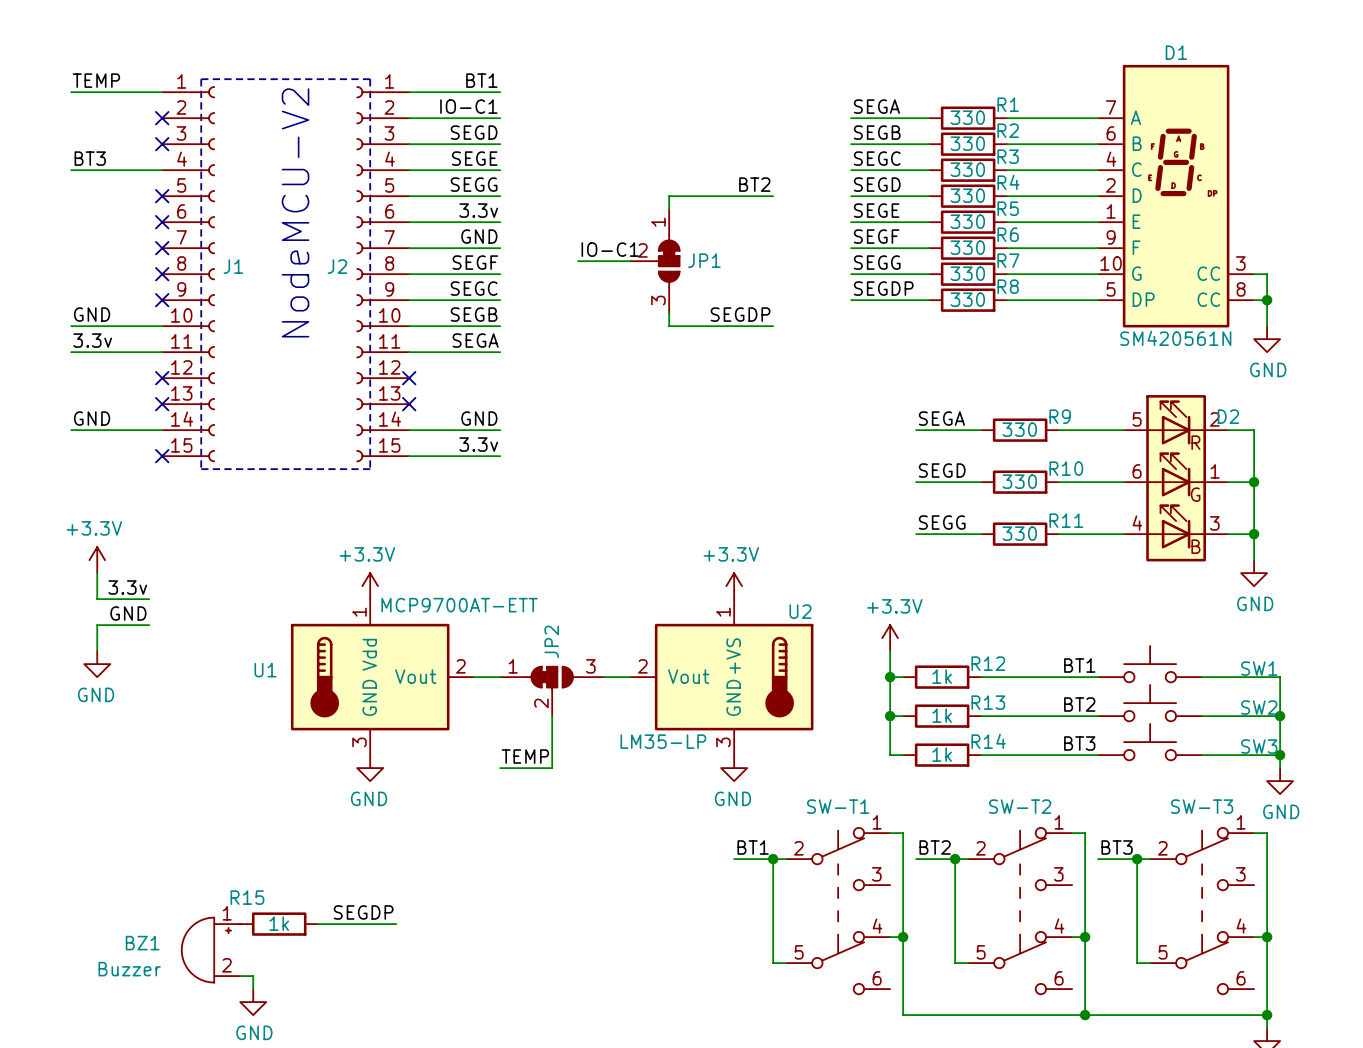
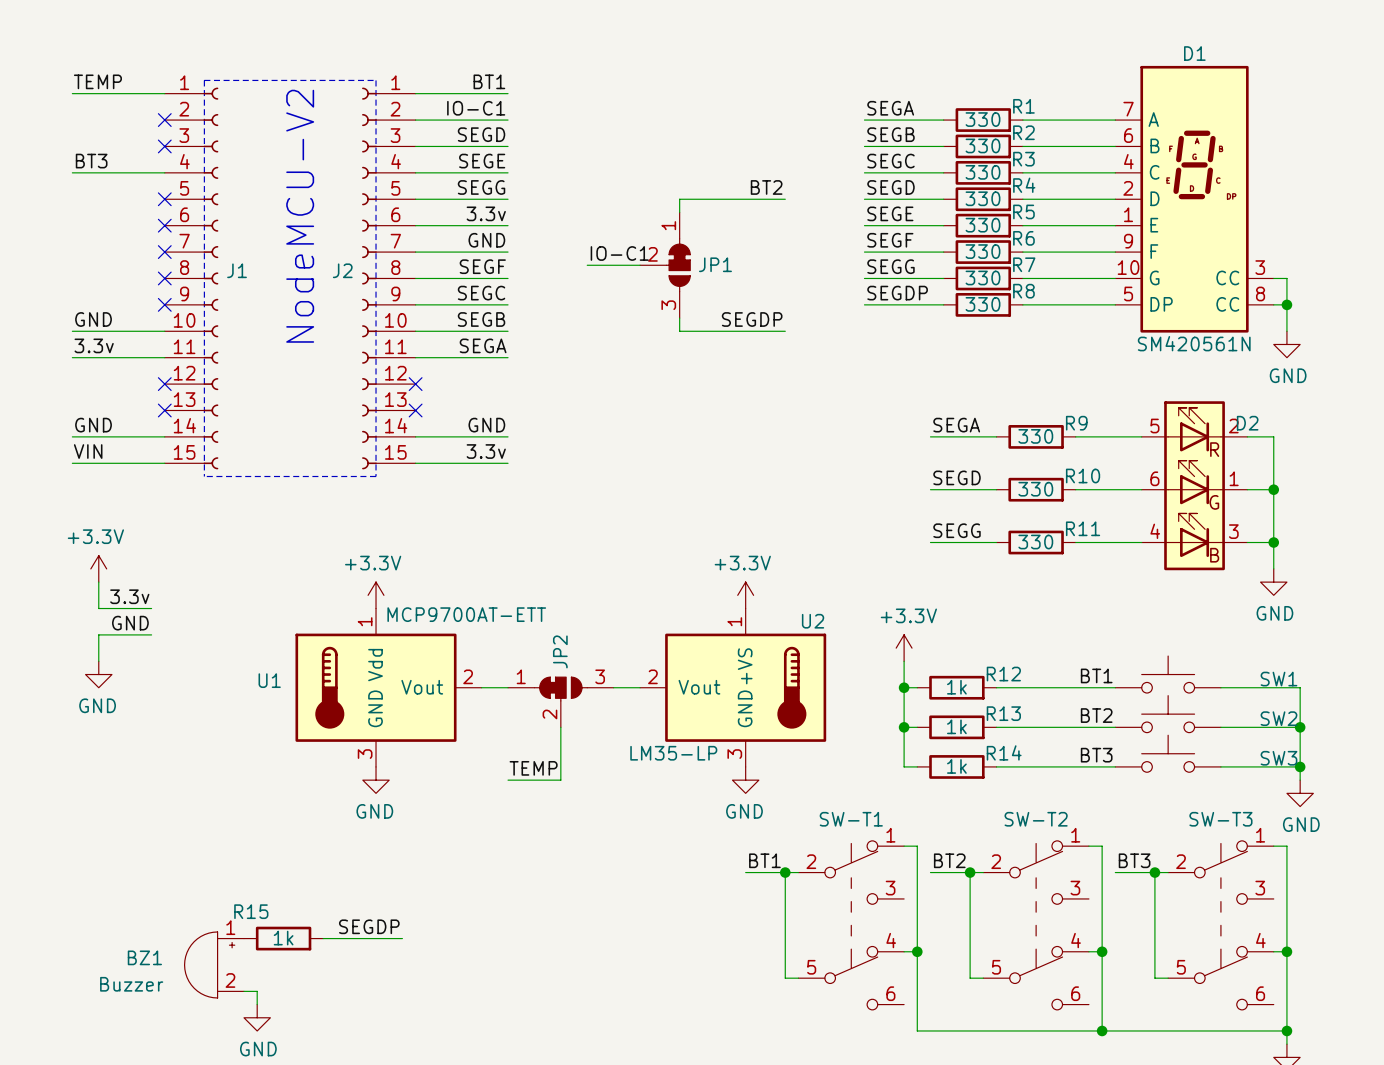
label: none -> VIN (88, 451)
wire: none -> (72, 463) (164, 463)
no-connect mark: (162, 456) -> none

